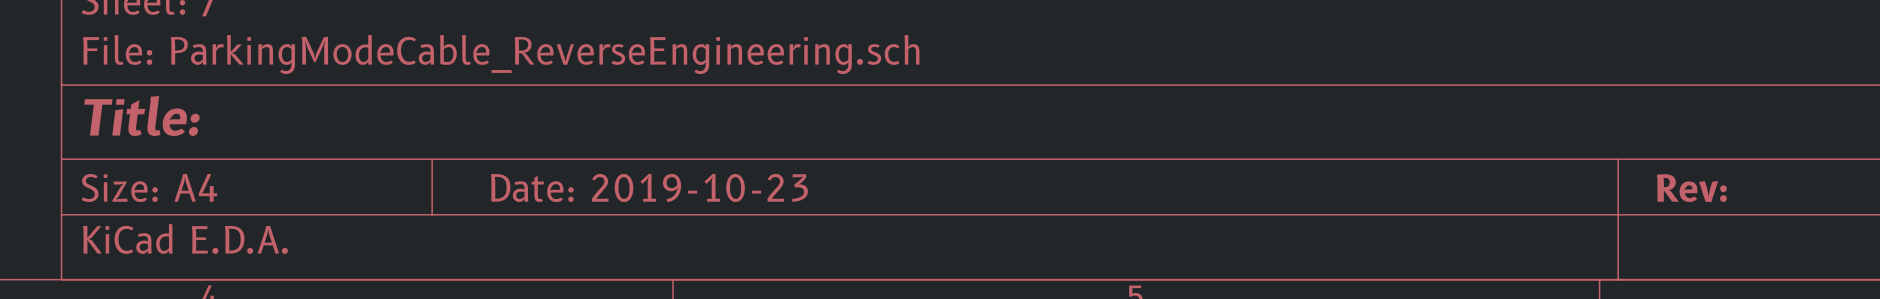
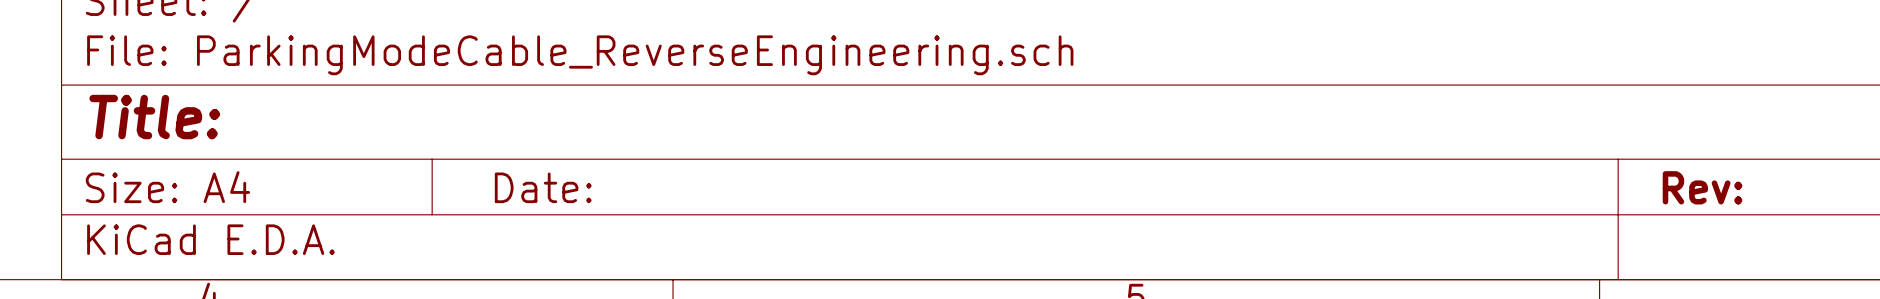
title block: Date: 2019-10-23 (649, 187) -> Date: (543, 187)

